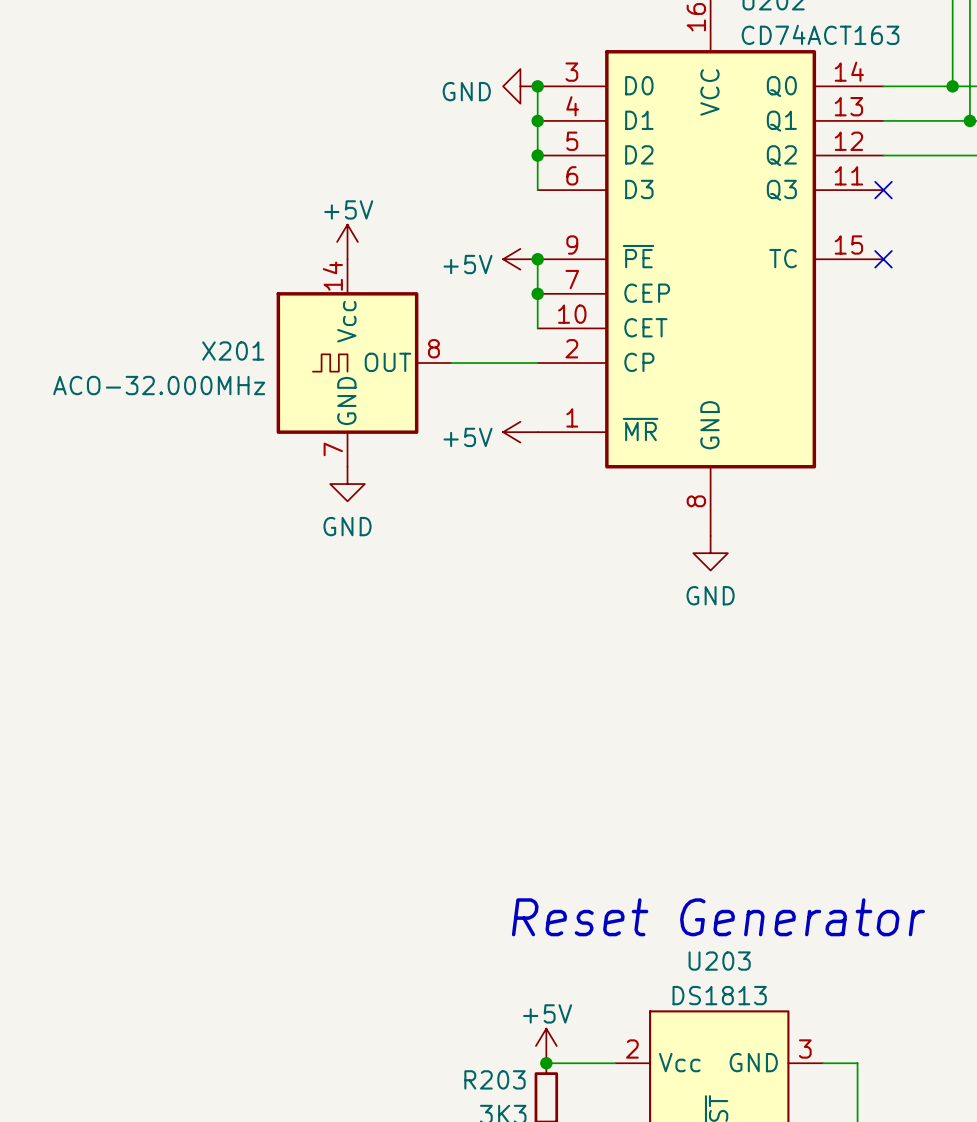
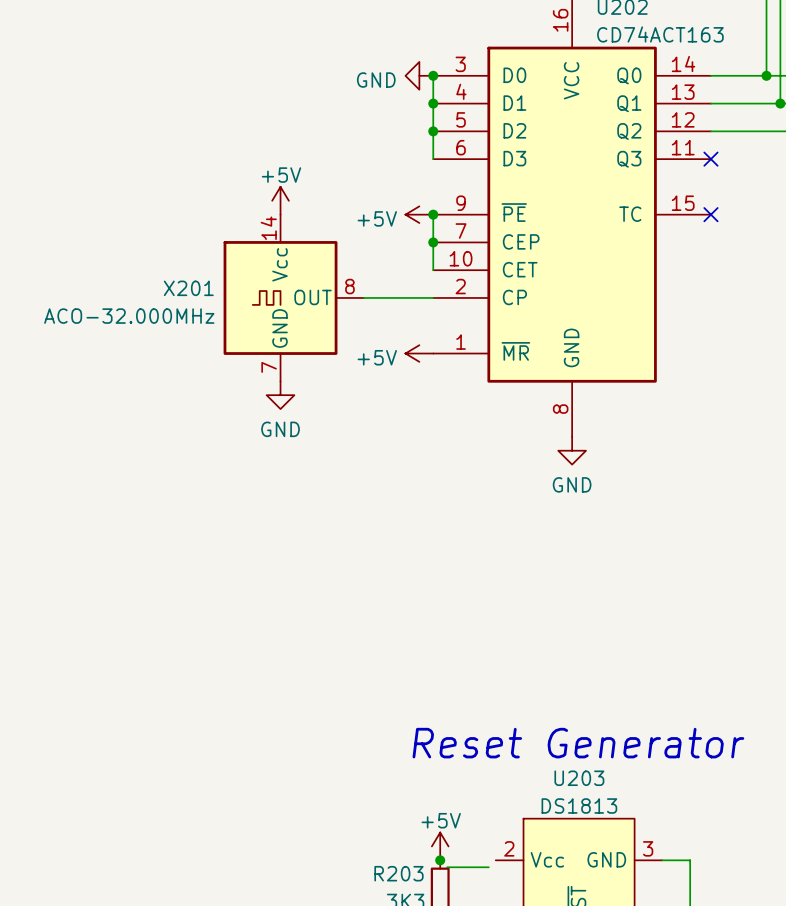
wire: (546, 1063) (615, 1063) -> none
wire: none -> (447, 867) (488, 867)

